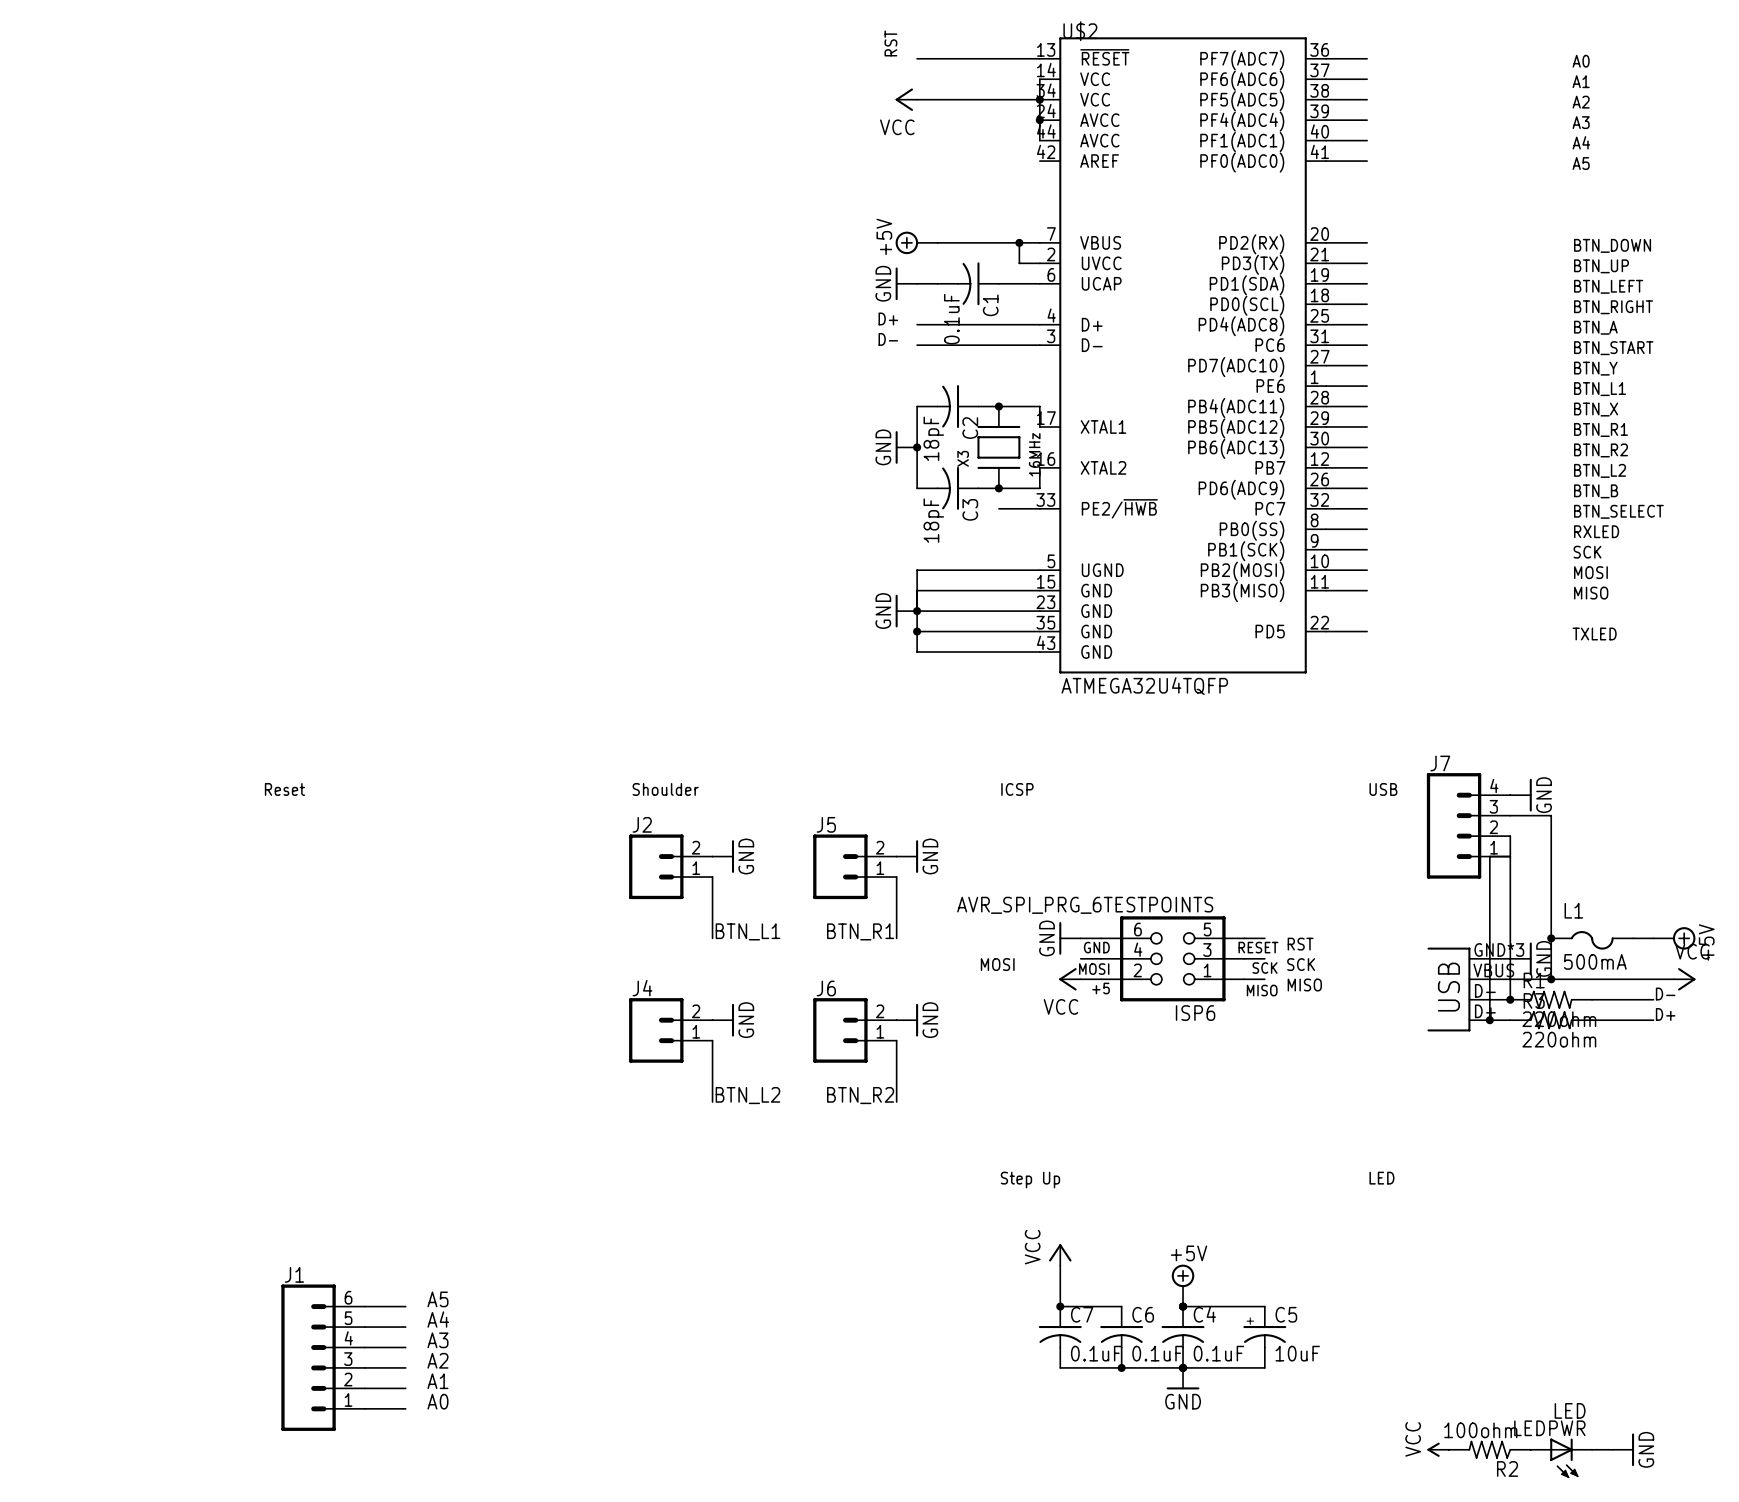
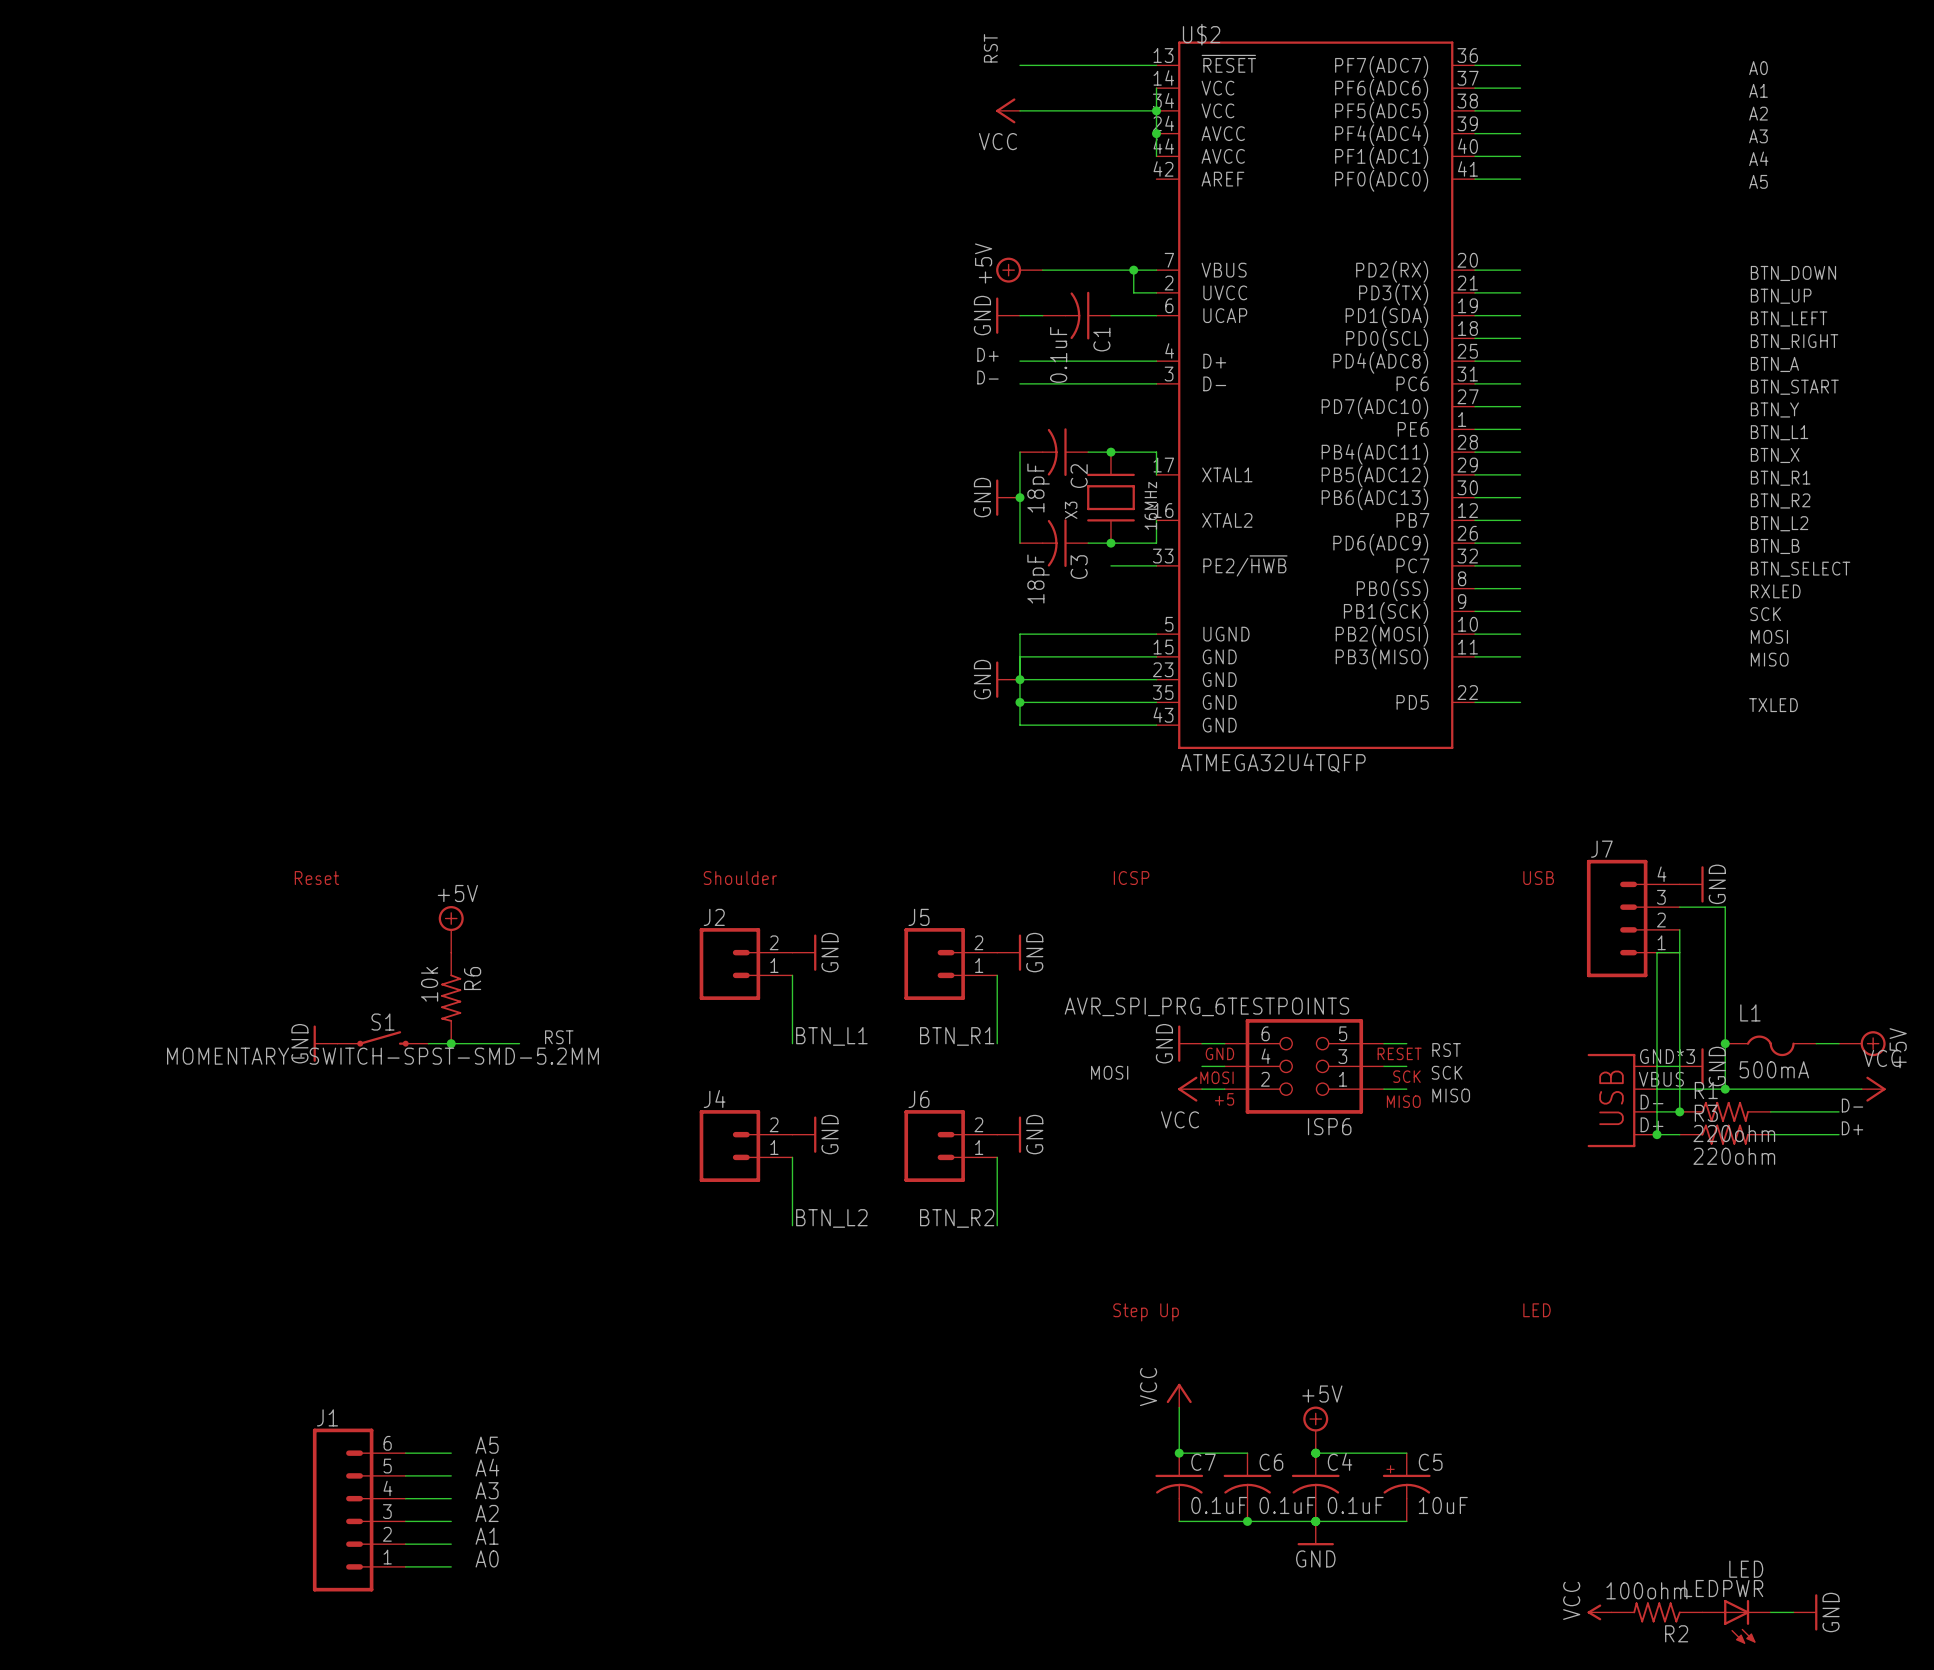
power symbol: none -> +5V (451, 929)
R6: none -> 10k (451, 998)
label: none -> RST (559, 1037)
S1: none -> MOMENTARY-SWITCH-SPST-SMD-5.2MM (382, 1038)
power symbol: none -> GND (325, 1043)
wire: none -> (428, 1043) (519, 1043)
junction: none -> (451, 1043)

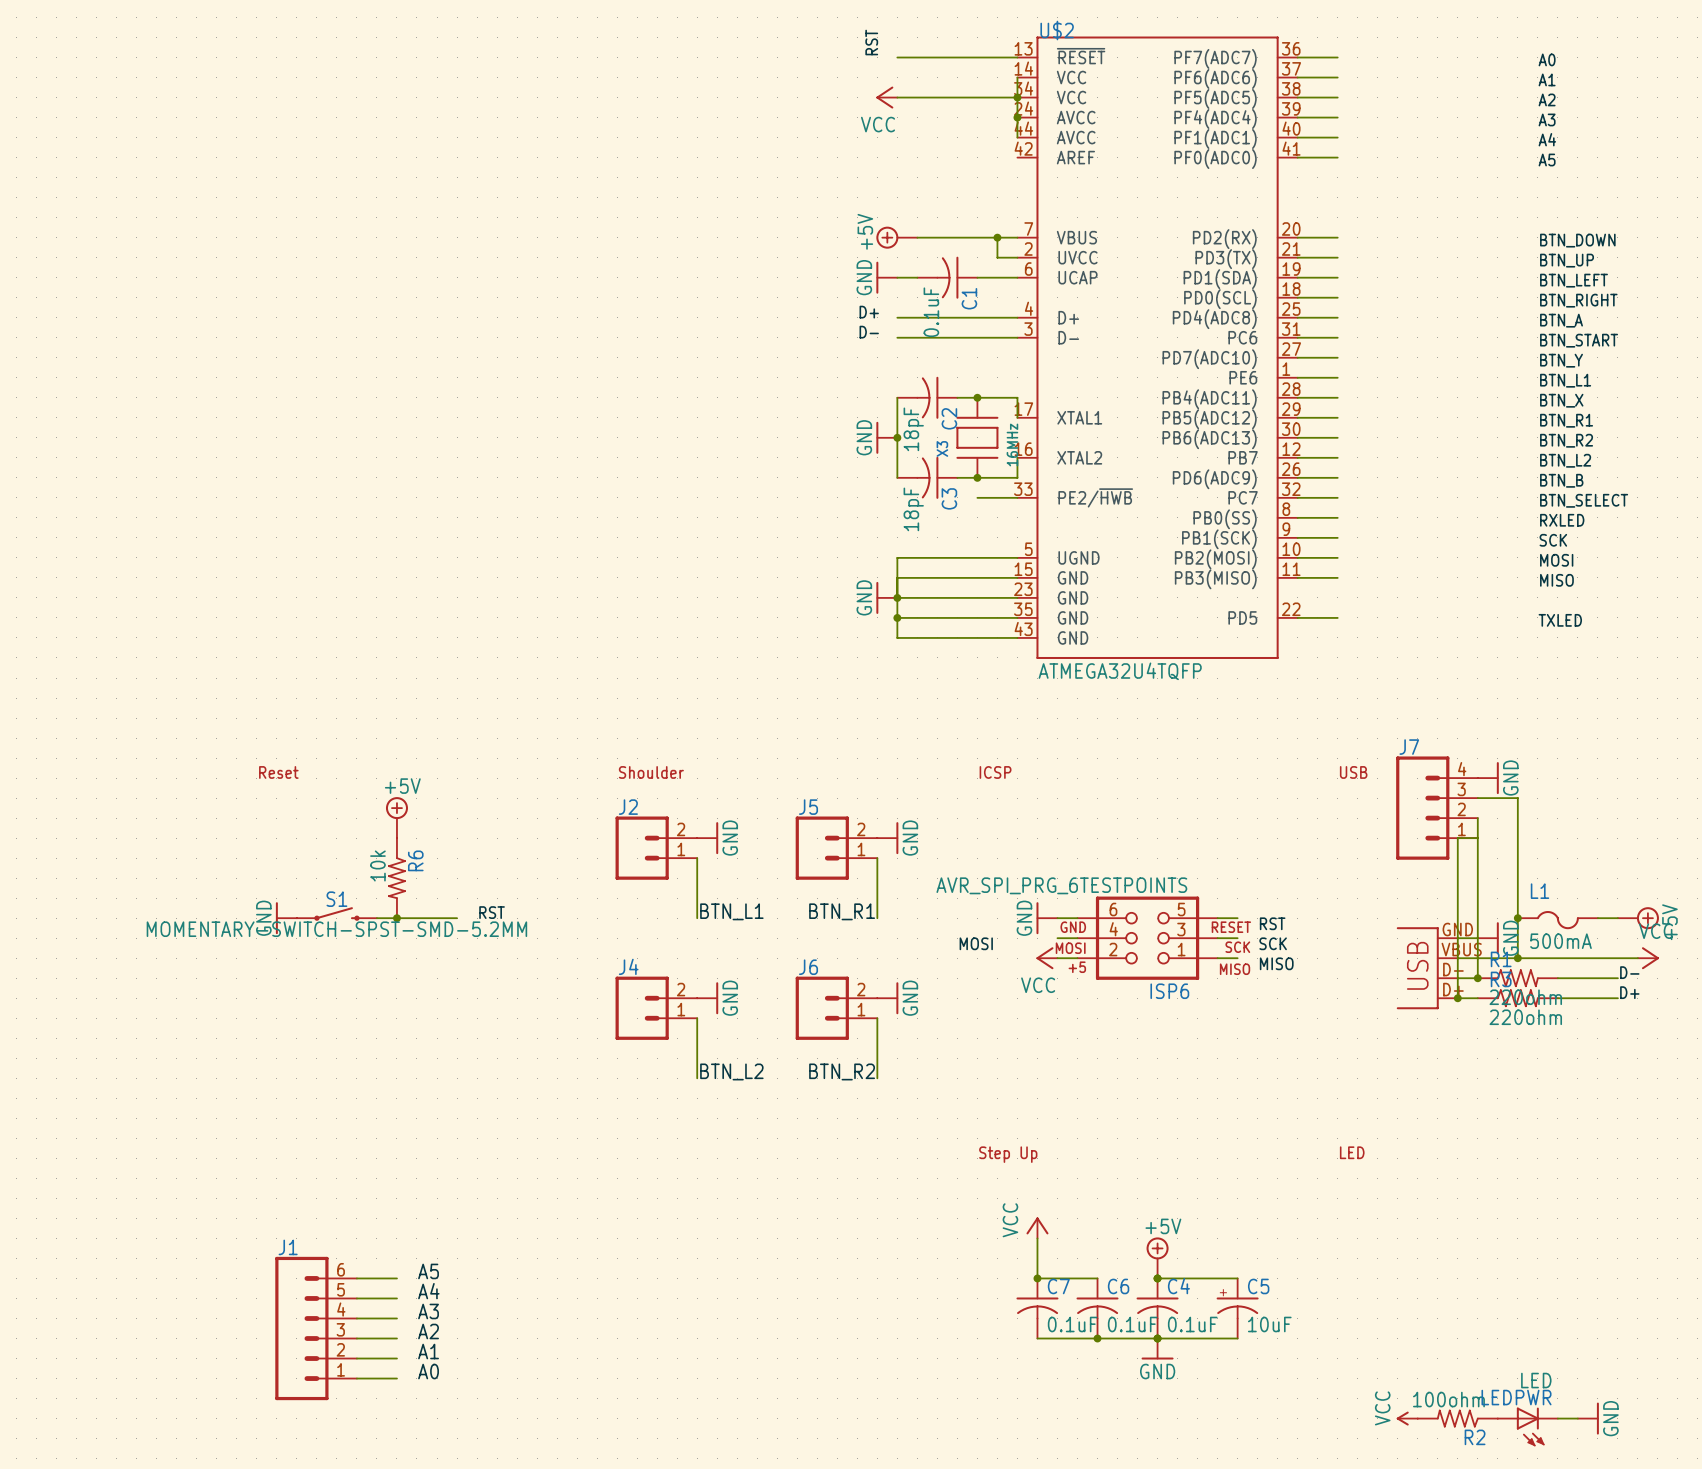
part pin number: GND*3 (1667, 1056) -> GND (1457, 929)

